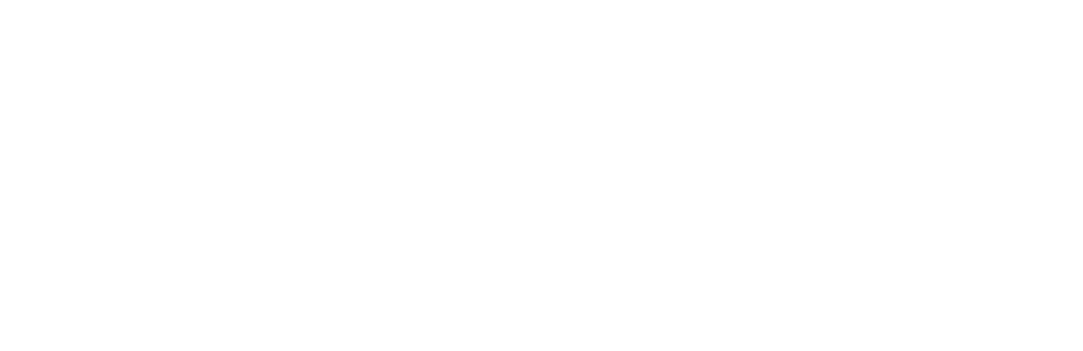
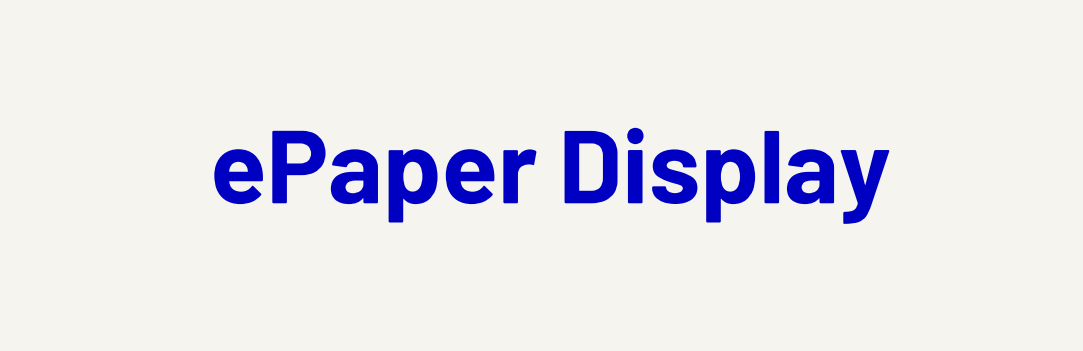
text: none -> ePaper Display (551, 175)

